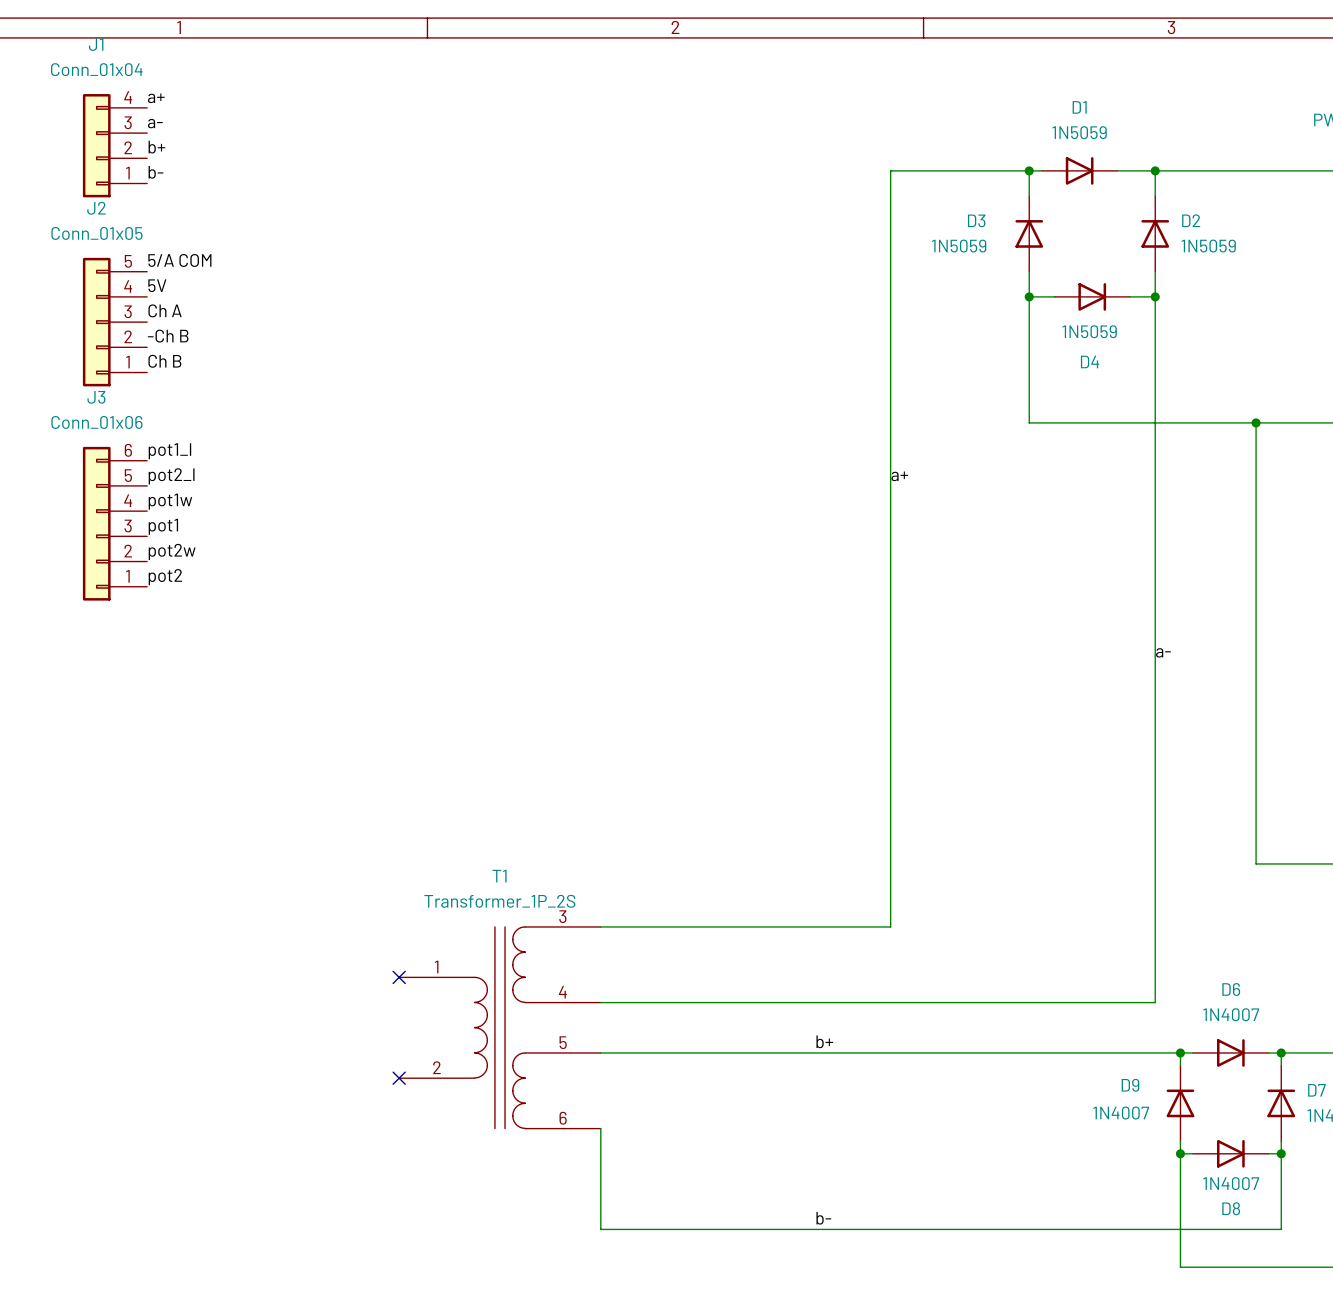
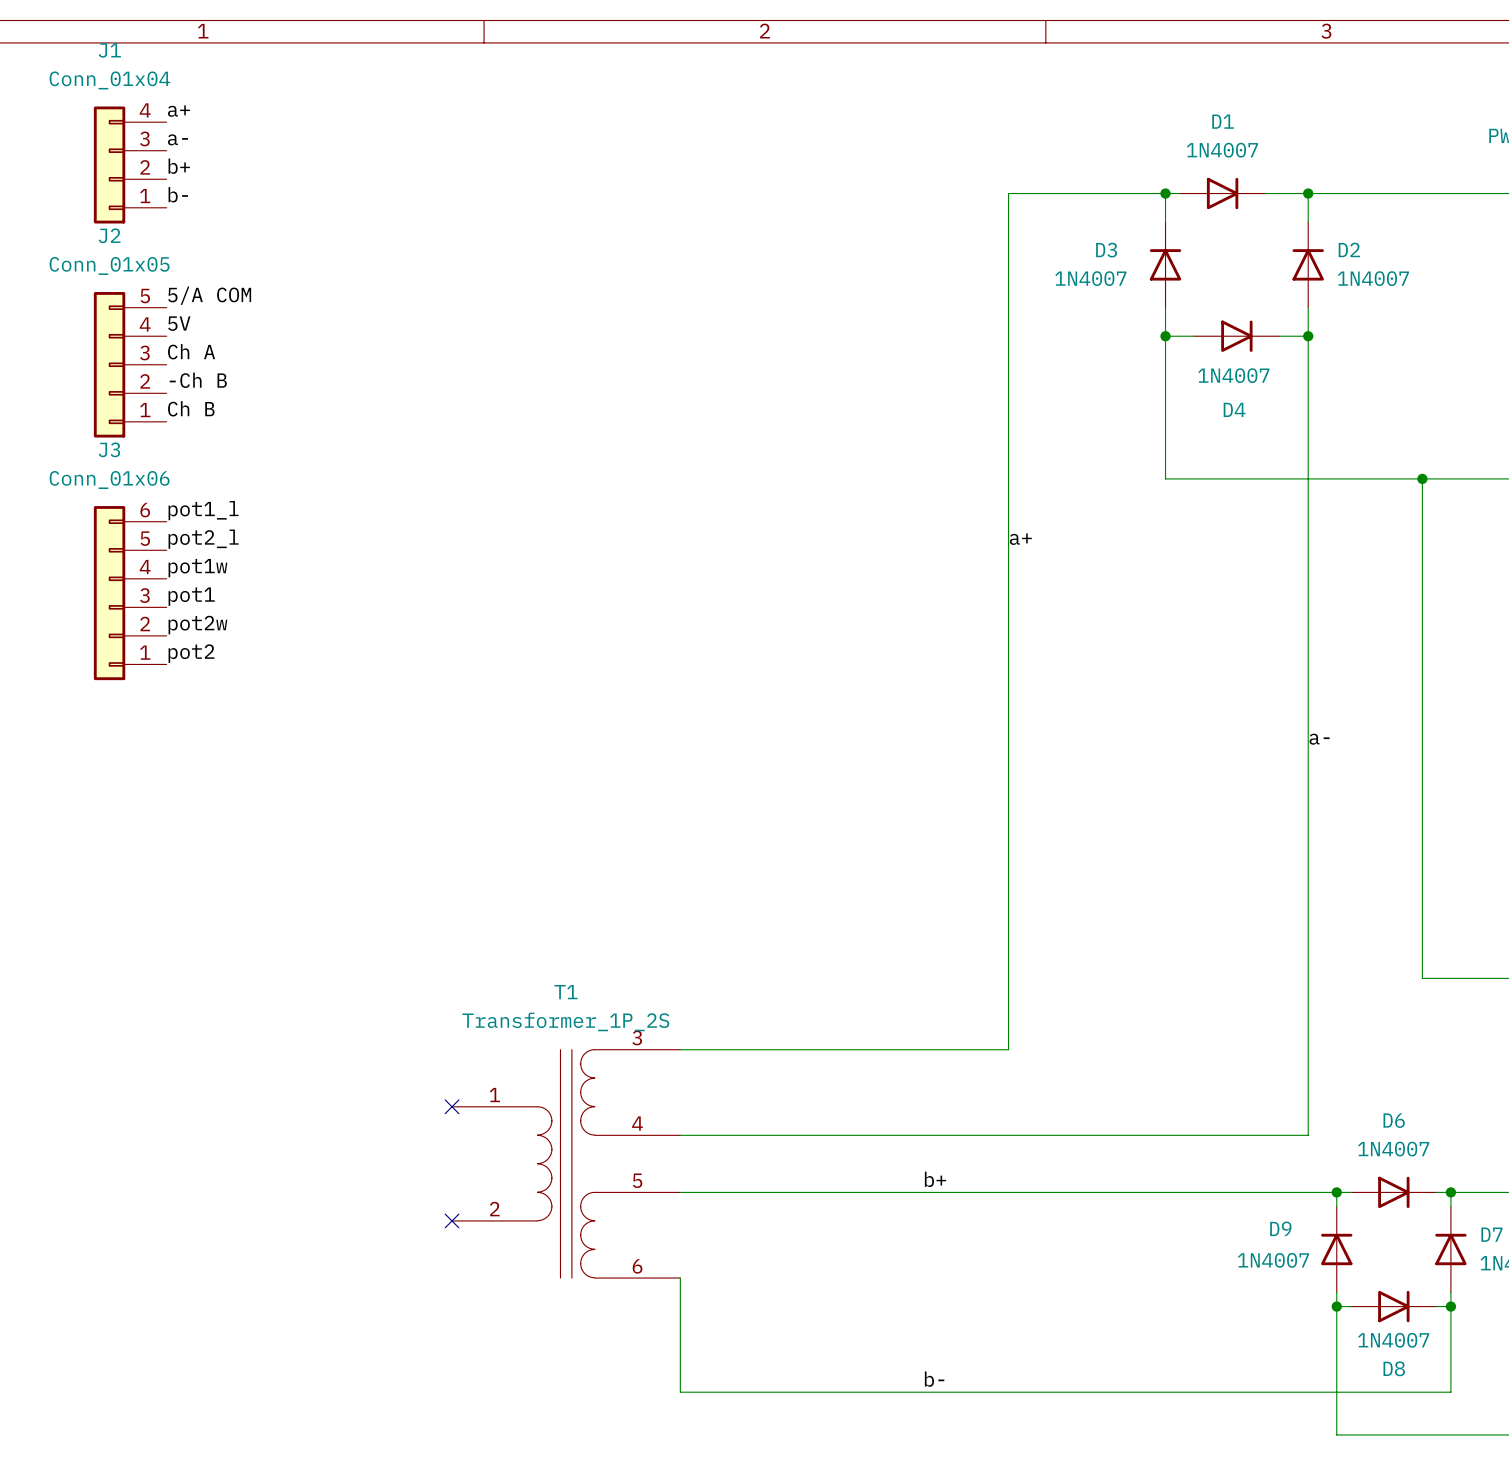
D1 value: 1N5059 (1079, 132) -> 1N4007 (1222, 150)
D3 value: 1N5059 (959, 246) -> 1N4007 (1090, 278)
D2 value: 1N5059 (1208, 246) -> 1N4007 (1373, 278)
D4 value: 1N5059 (1089, 331) -> 1N4007 (1233, 375)

